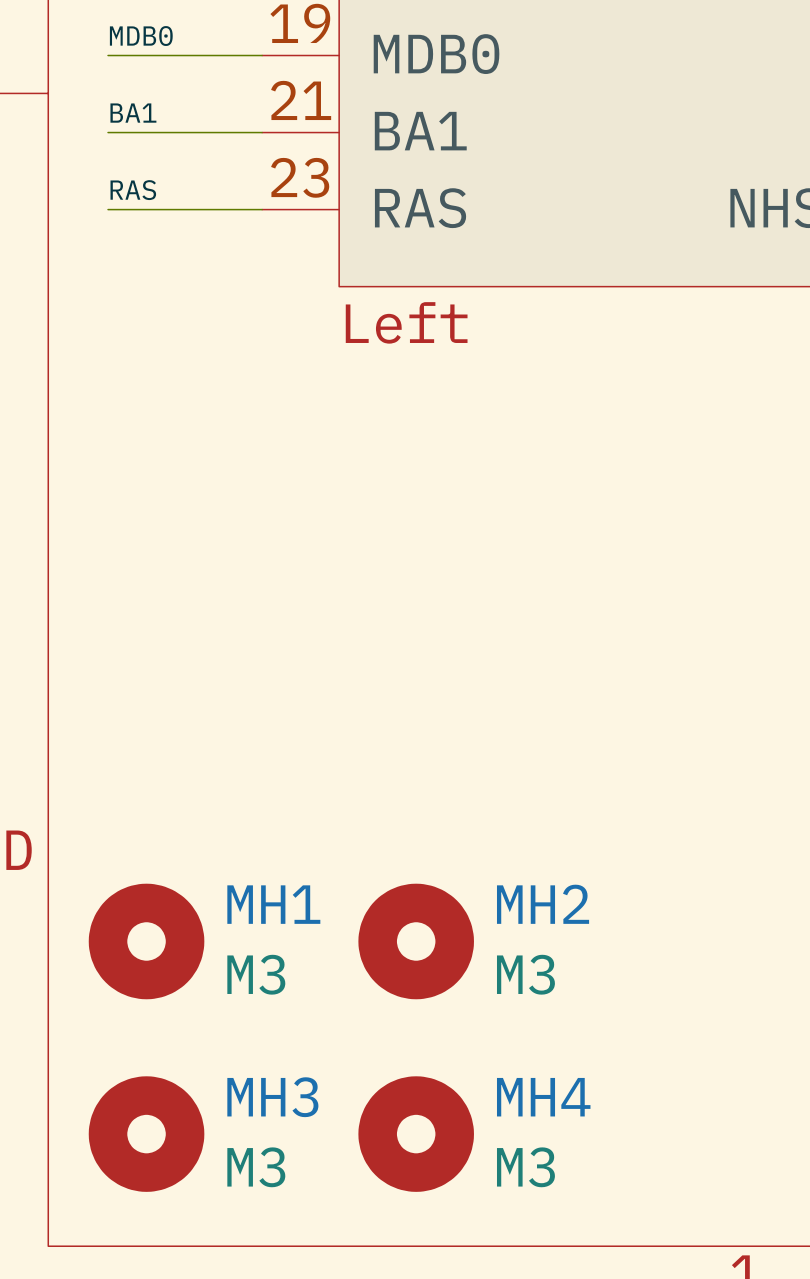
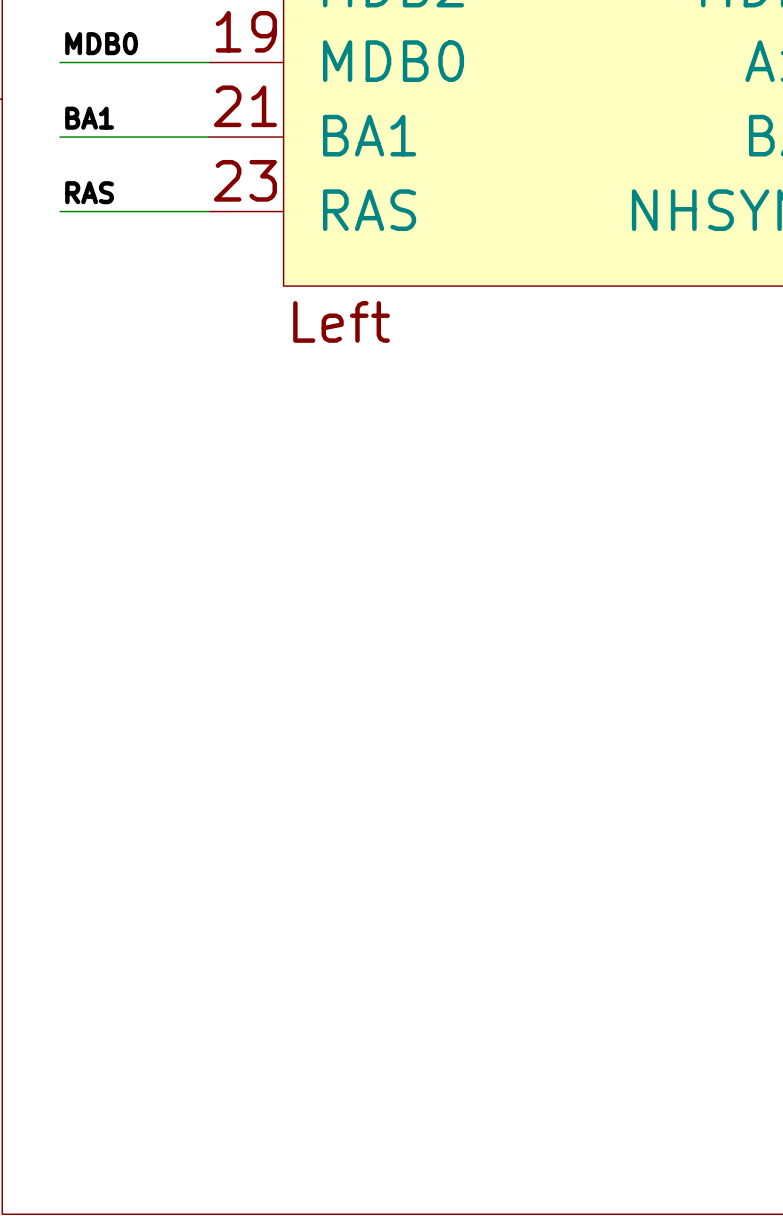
MH1: M3 (146, 941) -> none
MH2: M3 (416, 941) -> none
MH3: M3 (146, 1134) -> none
MH4: M3 (416, 1134) -> none

